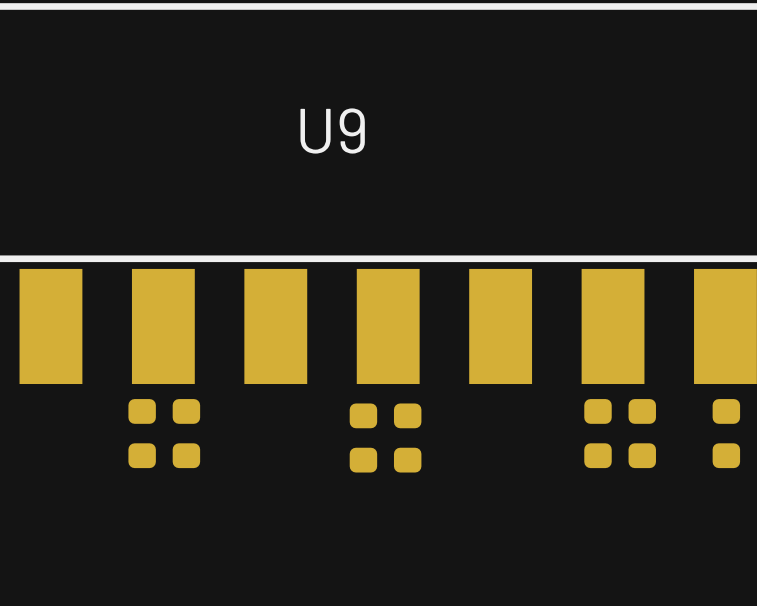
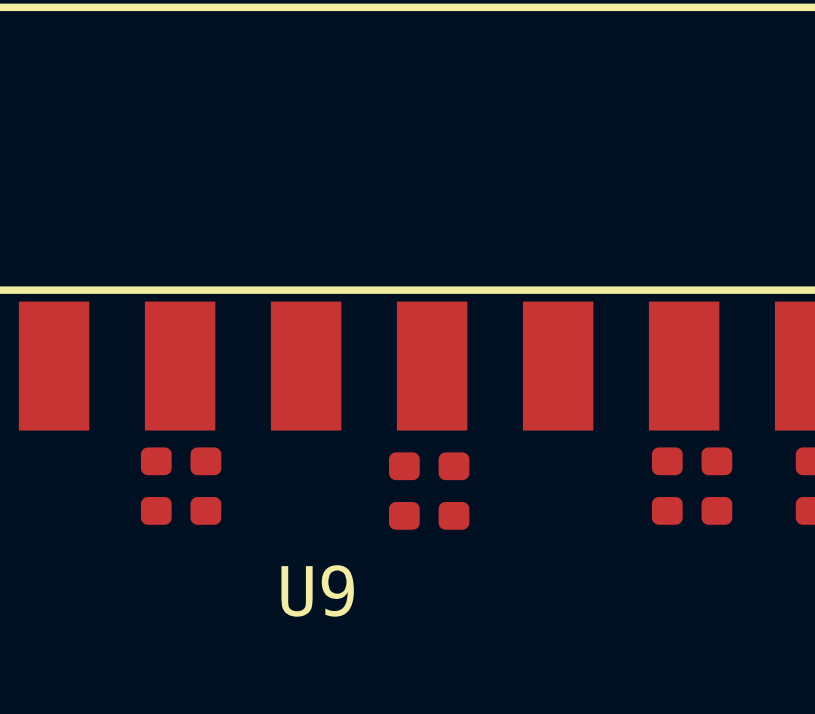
U9 name position: U9 (332, 130) -> U9 (317, 590)

